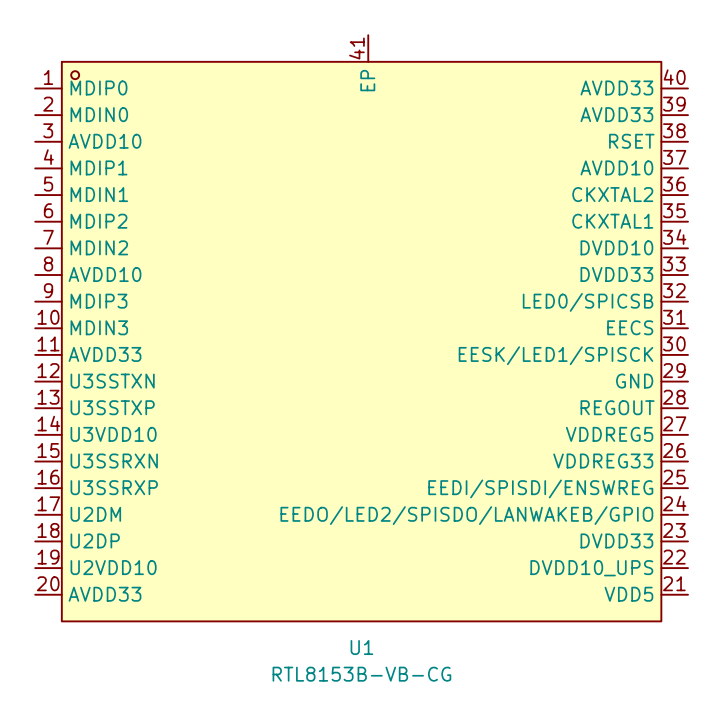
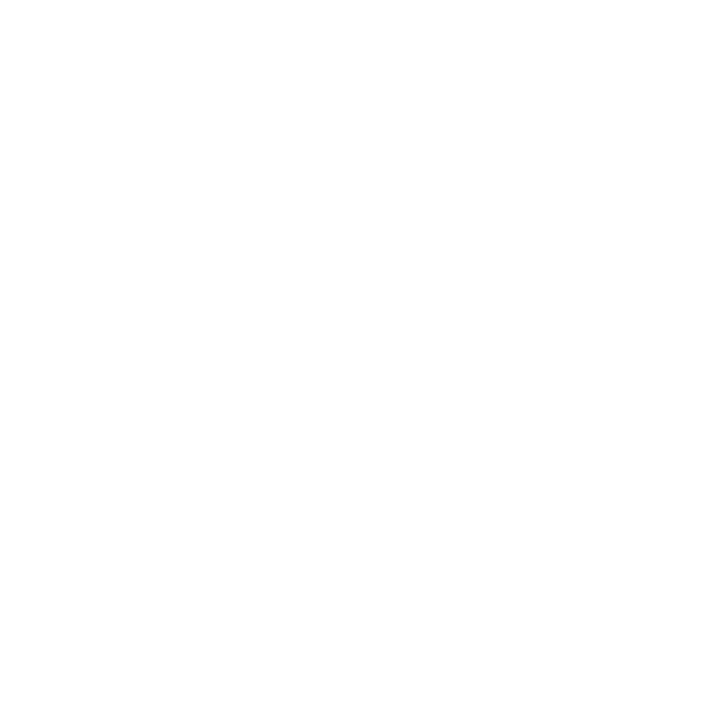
U1: RTL8153B-VB-CG (361, 328) -> none

